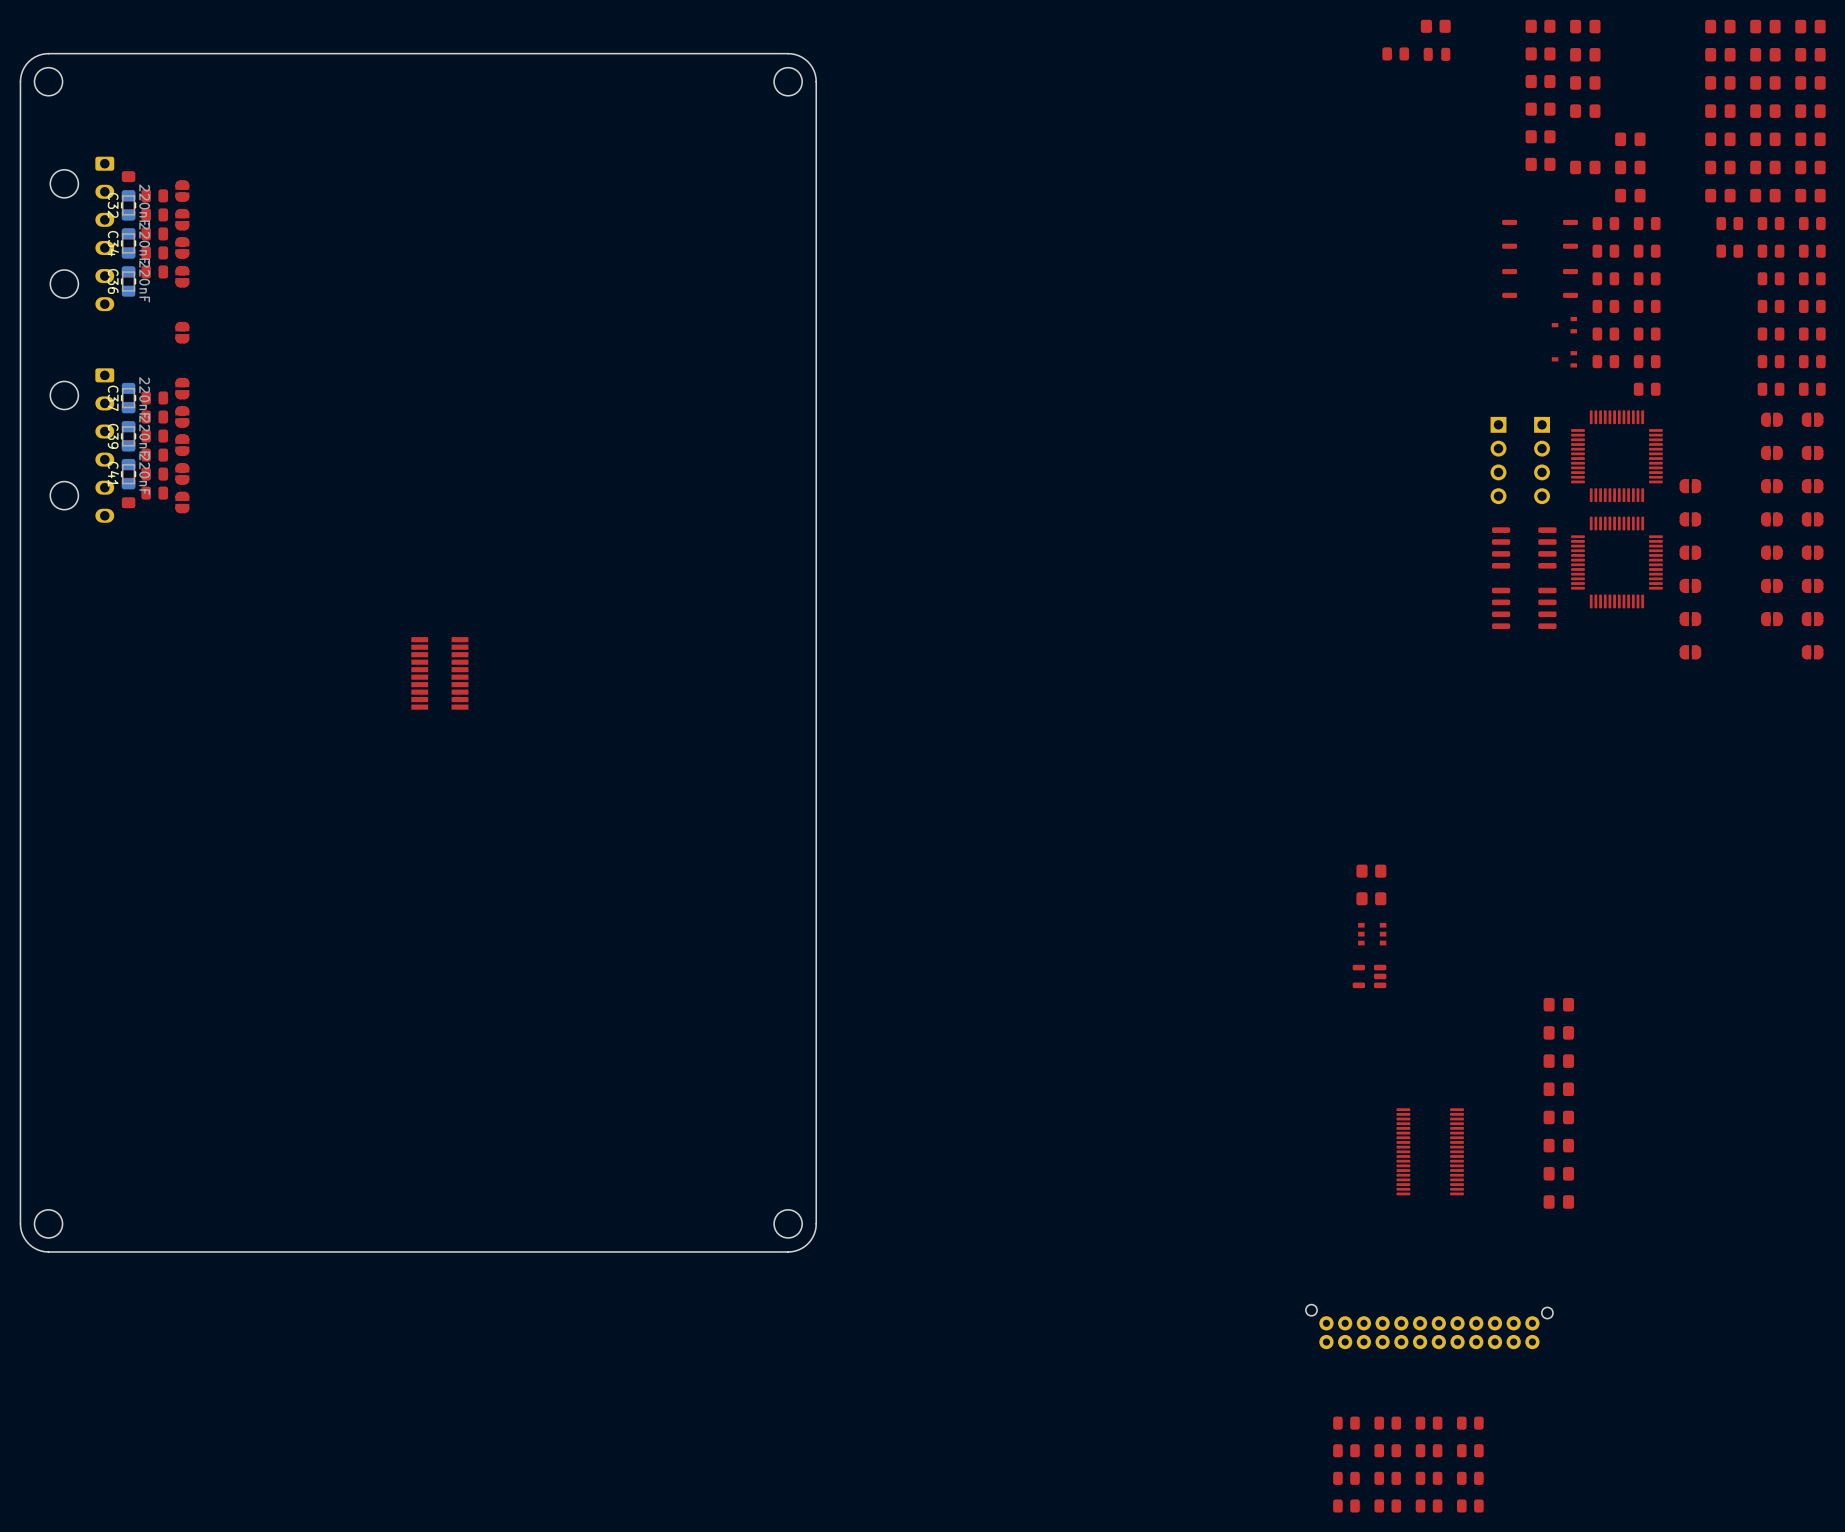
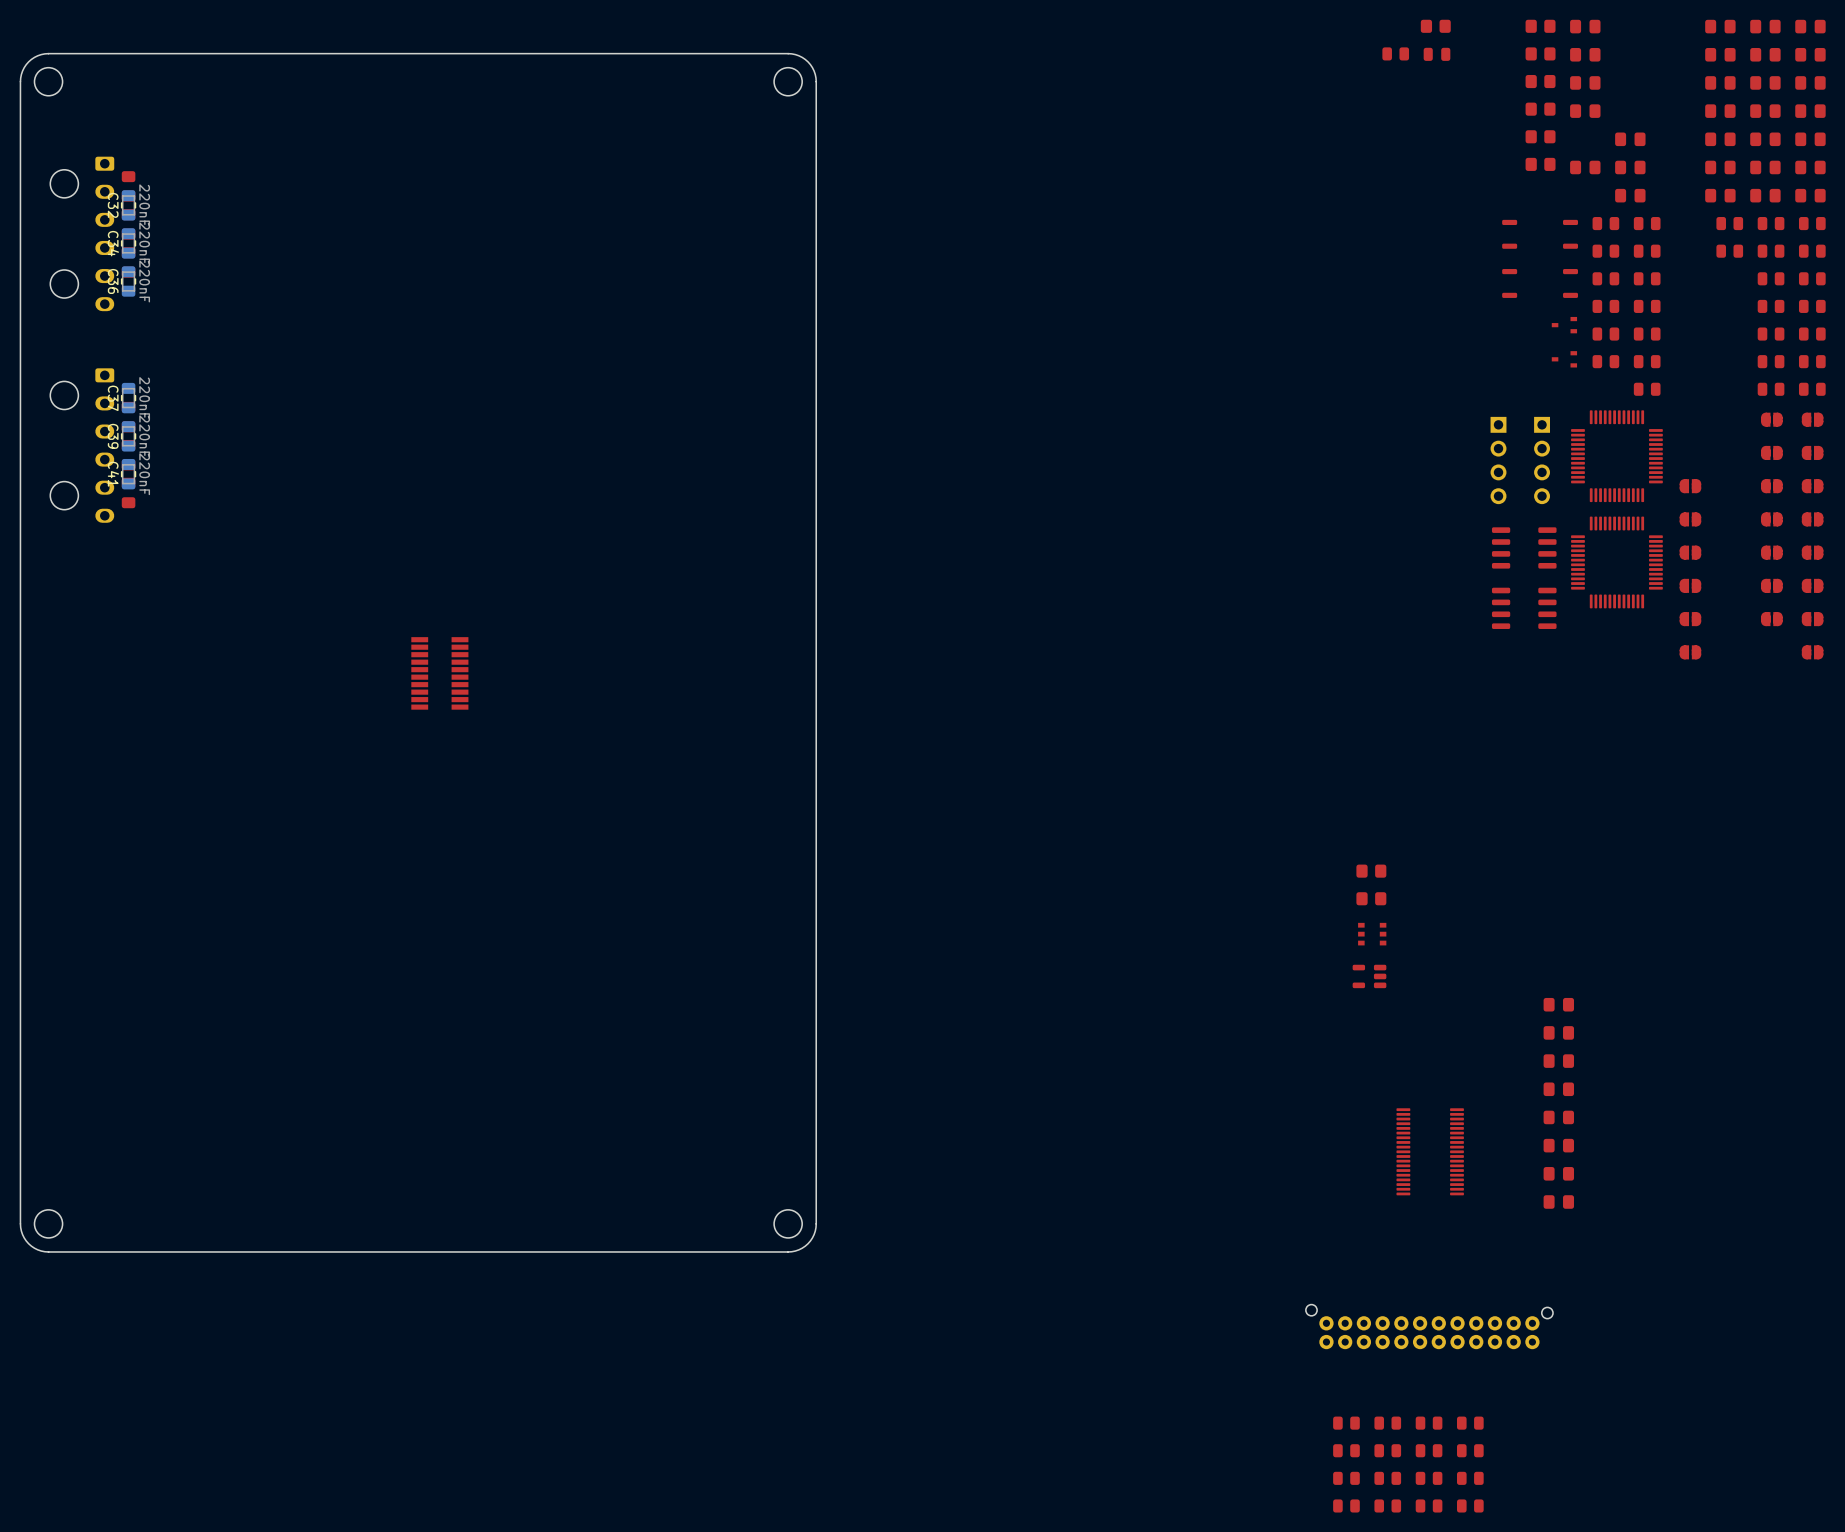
part: (182, 191) -> none
part: (154, 195) -> none
part: (154, 214) -> none
part: (182, 219) -> none
part: (154, 233) -> none
part: (182, 247) -> none
part: (154, 252) -> none
part: (154, 271) -> none
part: (182, 276) -> none
part: (182, 332) -> none
part: (182, 388) -> none
part: (154, 397) -> none
part: (182, 416) -> none
part: (154, 417) -> none
part: (154, 436) -> none
part: (182, 445) -> none
part: (154, 455) -> none
part: (182, 473) -> none
part: (154, 474) -> none
part: (154, 493) -> none
part: (182, 502) -> none

